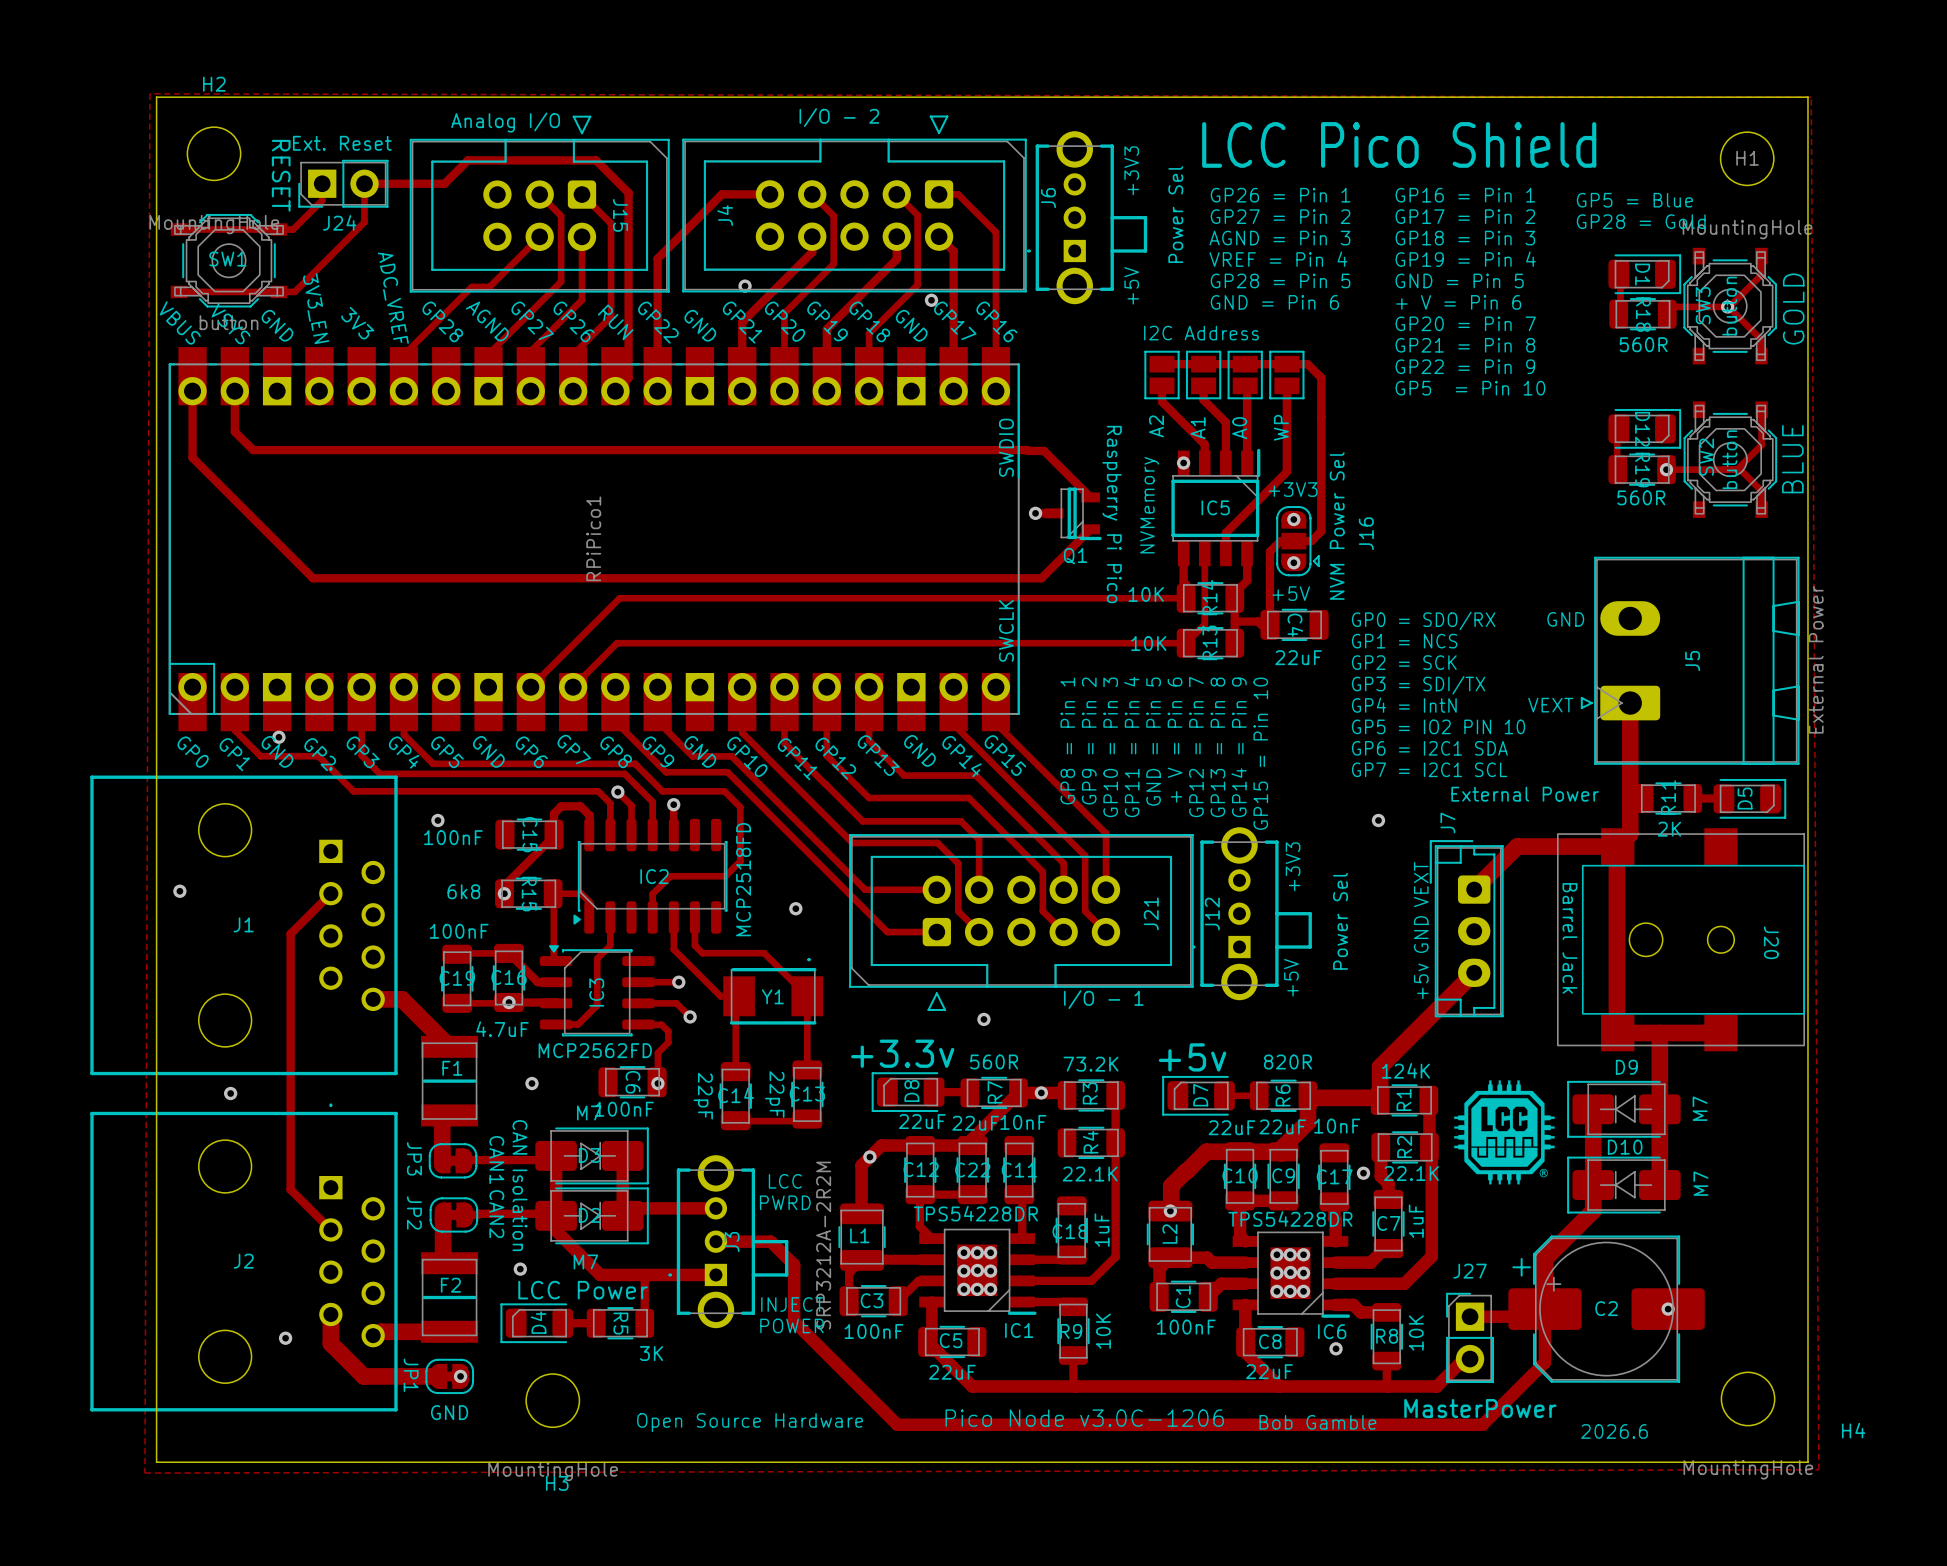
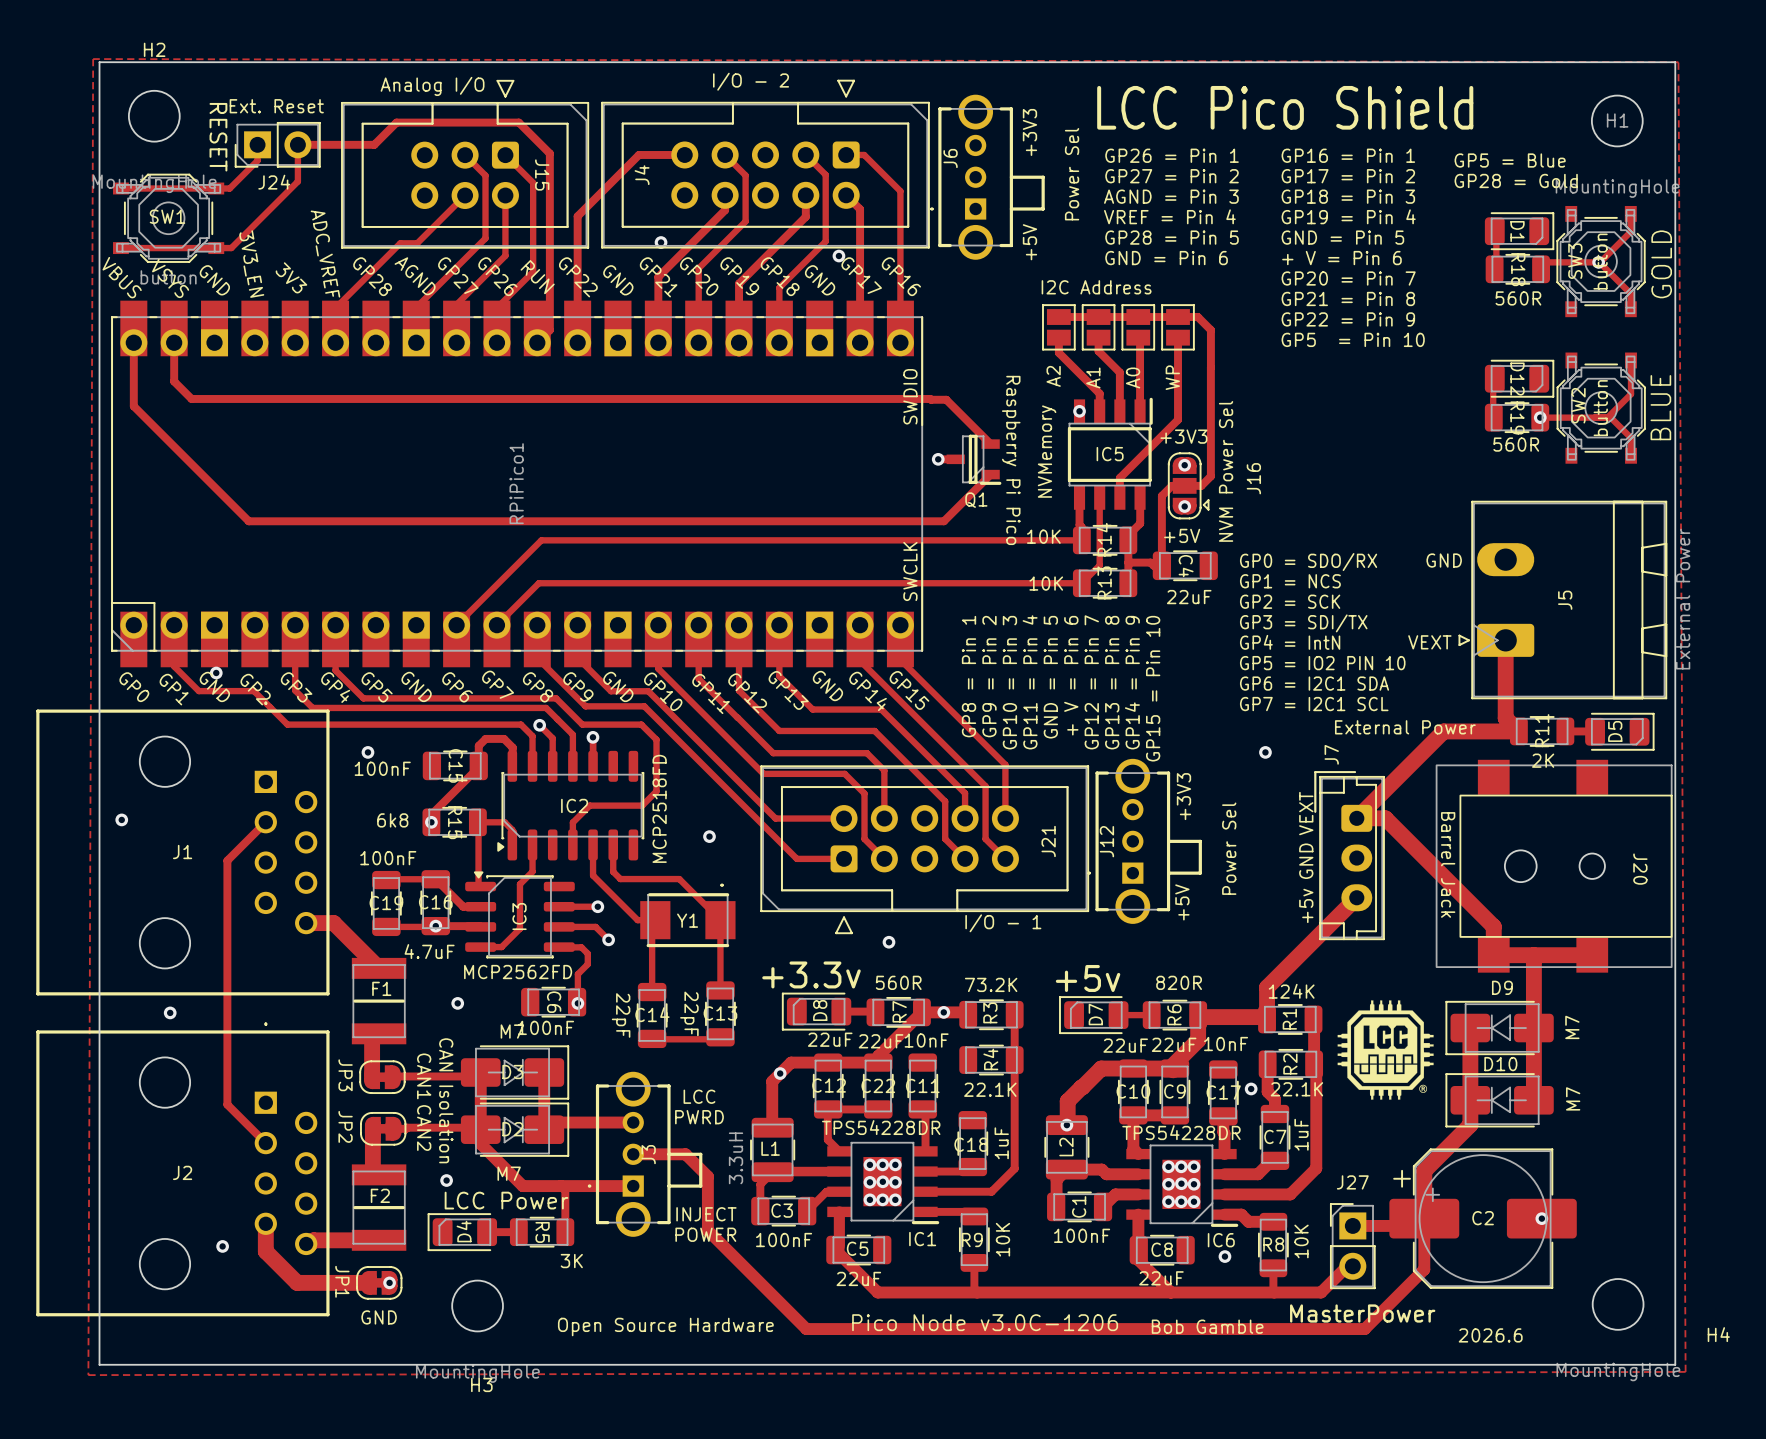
track: (1630, 784) (1630, 834) (1617, 846) (1517, 846) -> (1507, 731) (1443, 731) (1397, 777)
track: (1616, 847) (1617, 1032) -> (1356, 818) (1385, 818) (1493, 926) (1493, 955)
L1 value: SRP3212A-2R2M (823, 1245) -> 3.3uH (736, 1158)

